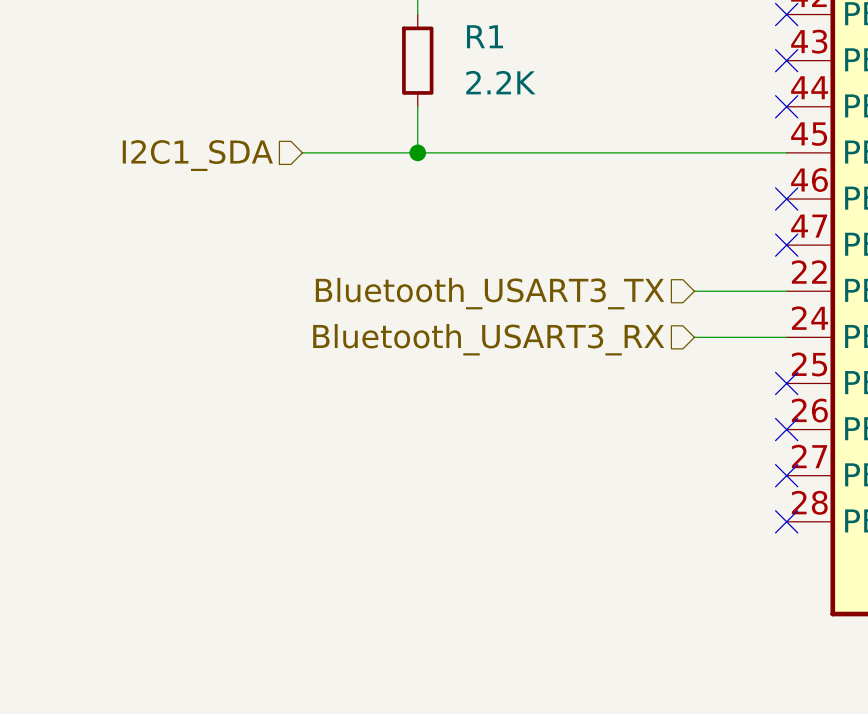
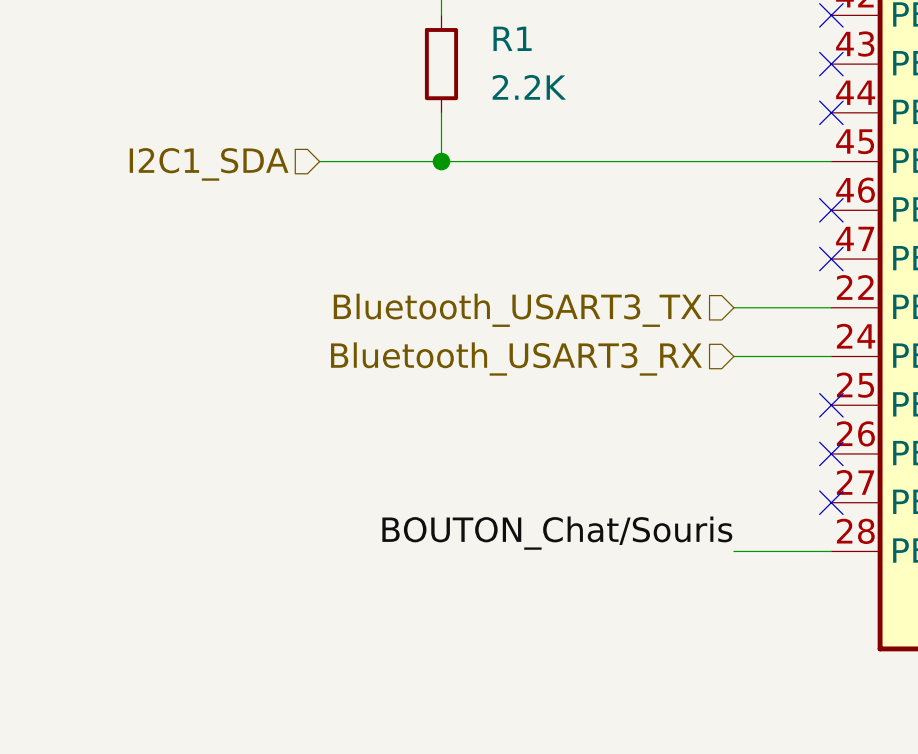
label: none -> BOUTON_Chat/Souris (557, 533)
wire: none -> (733, 551) (831, 551)
no-connect mark: (786, 521) -> none

